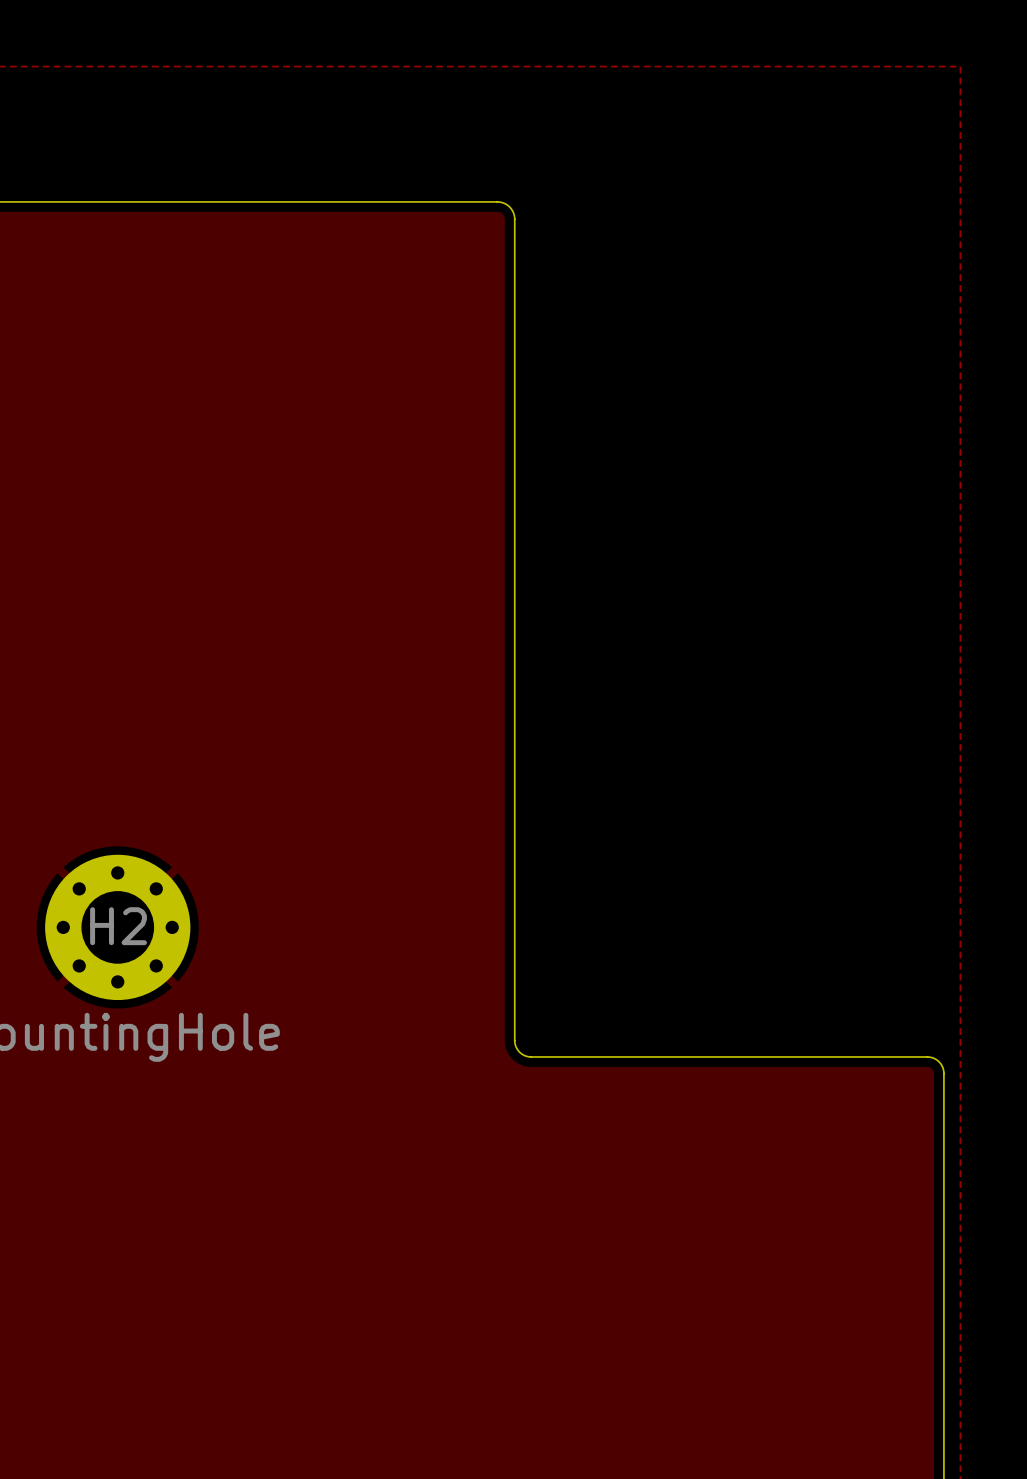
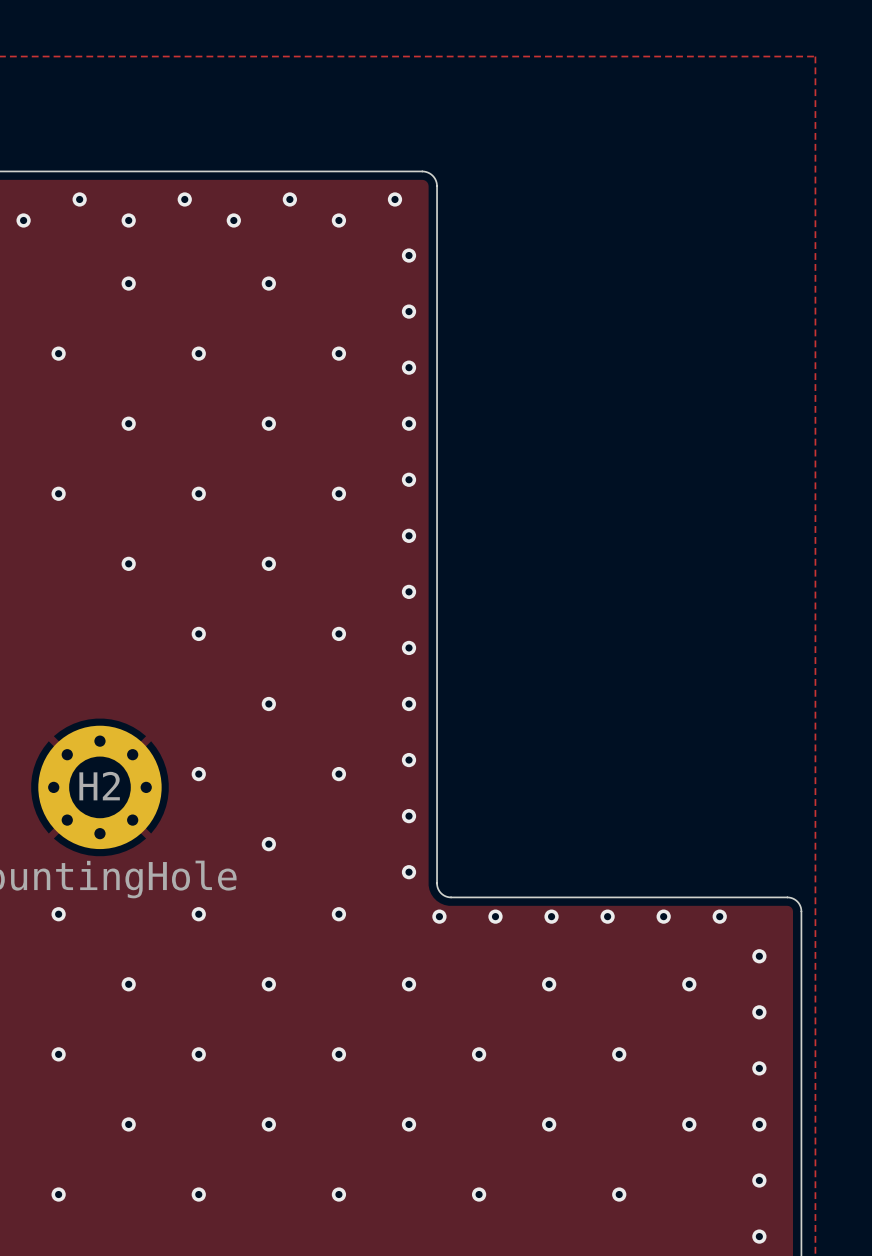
via: none -> (79, 199)
via: none -> (184, 199)
via: none -> (289, 199)
via: none -> (394, 199)
via: none -> (23, 220)
via: none -> (128, 220)
via: none -> (233, 220)
via: none -> (338, 220)
via: none -> (409, 255)
via: none -> (128, 283)
via: none -> (268, 283)
via: none -> (409, 311)
via: none -> (58, 353)
via: none -> (198, 353)
via: none -> (338, 353)
via: none -> (409, 367)
via: none -> (128, 423)
via: none -> (268, 423)
via: none -> (409, 423)
via: none -> (409, 479)
via: none -> (58, 493)
via: none -> (198, 493)
via: none -> (338, 493)
via: none -> (409, 535)
via: none -> (128, 563)
via: none -> (268, 563)
via: none -> (409, 591)
via: none -> (198, 633)
via: none -> (338, 633)
via: none -> (409, 647)
via: none -> (268, 704)
via: none -> (409, 704)
via: none -> (409, 760)
via: none -> (198, 774)
via: none -> (338, 774)
via: none -> (409, 816)
via: none -> (268, 844)
via: none -> (409, 872)
via: none -> (58, 914)
via: none -> (198, 914)
via: none -> (338, 914)
via: none -> (439, 916)
via: none -> (495, 916)
via: none -> (551, 916)
via: none -> (607, 916)
via: none -> (663, 916)
via: none -> (719, 916)
via: none -> (759, 956)
via: none -> (128, 984)
via: none -> (268, 984)
via: none -> (409, 984)
via: none -> (549, 984)
via: none -> (689, 984)
via: none -> (759, 1012)
via: none -> (58, 1054)
via: none -> (198, 1054)
via: none -> (338, 1054)
via: none -> (479, 1054)
via: none -> (619, 1054)
via: none -> (759, 1068)
via: none -> (128, 1124)
via: none -> (268, 1124)
via: none -> (409, 1124)
via: none -> (549, 1124)
via: none -> (689, 1124)
via: none -> (759, 1124)
via: none -> (759, 1180)
via: none -> (58, 1194)
via: none -> (198, 1194)
via: none -> (338, 1194)
via: none -> (479, 1194)
via: none -> (619, 1194)
via: none -> (759, 1236)

